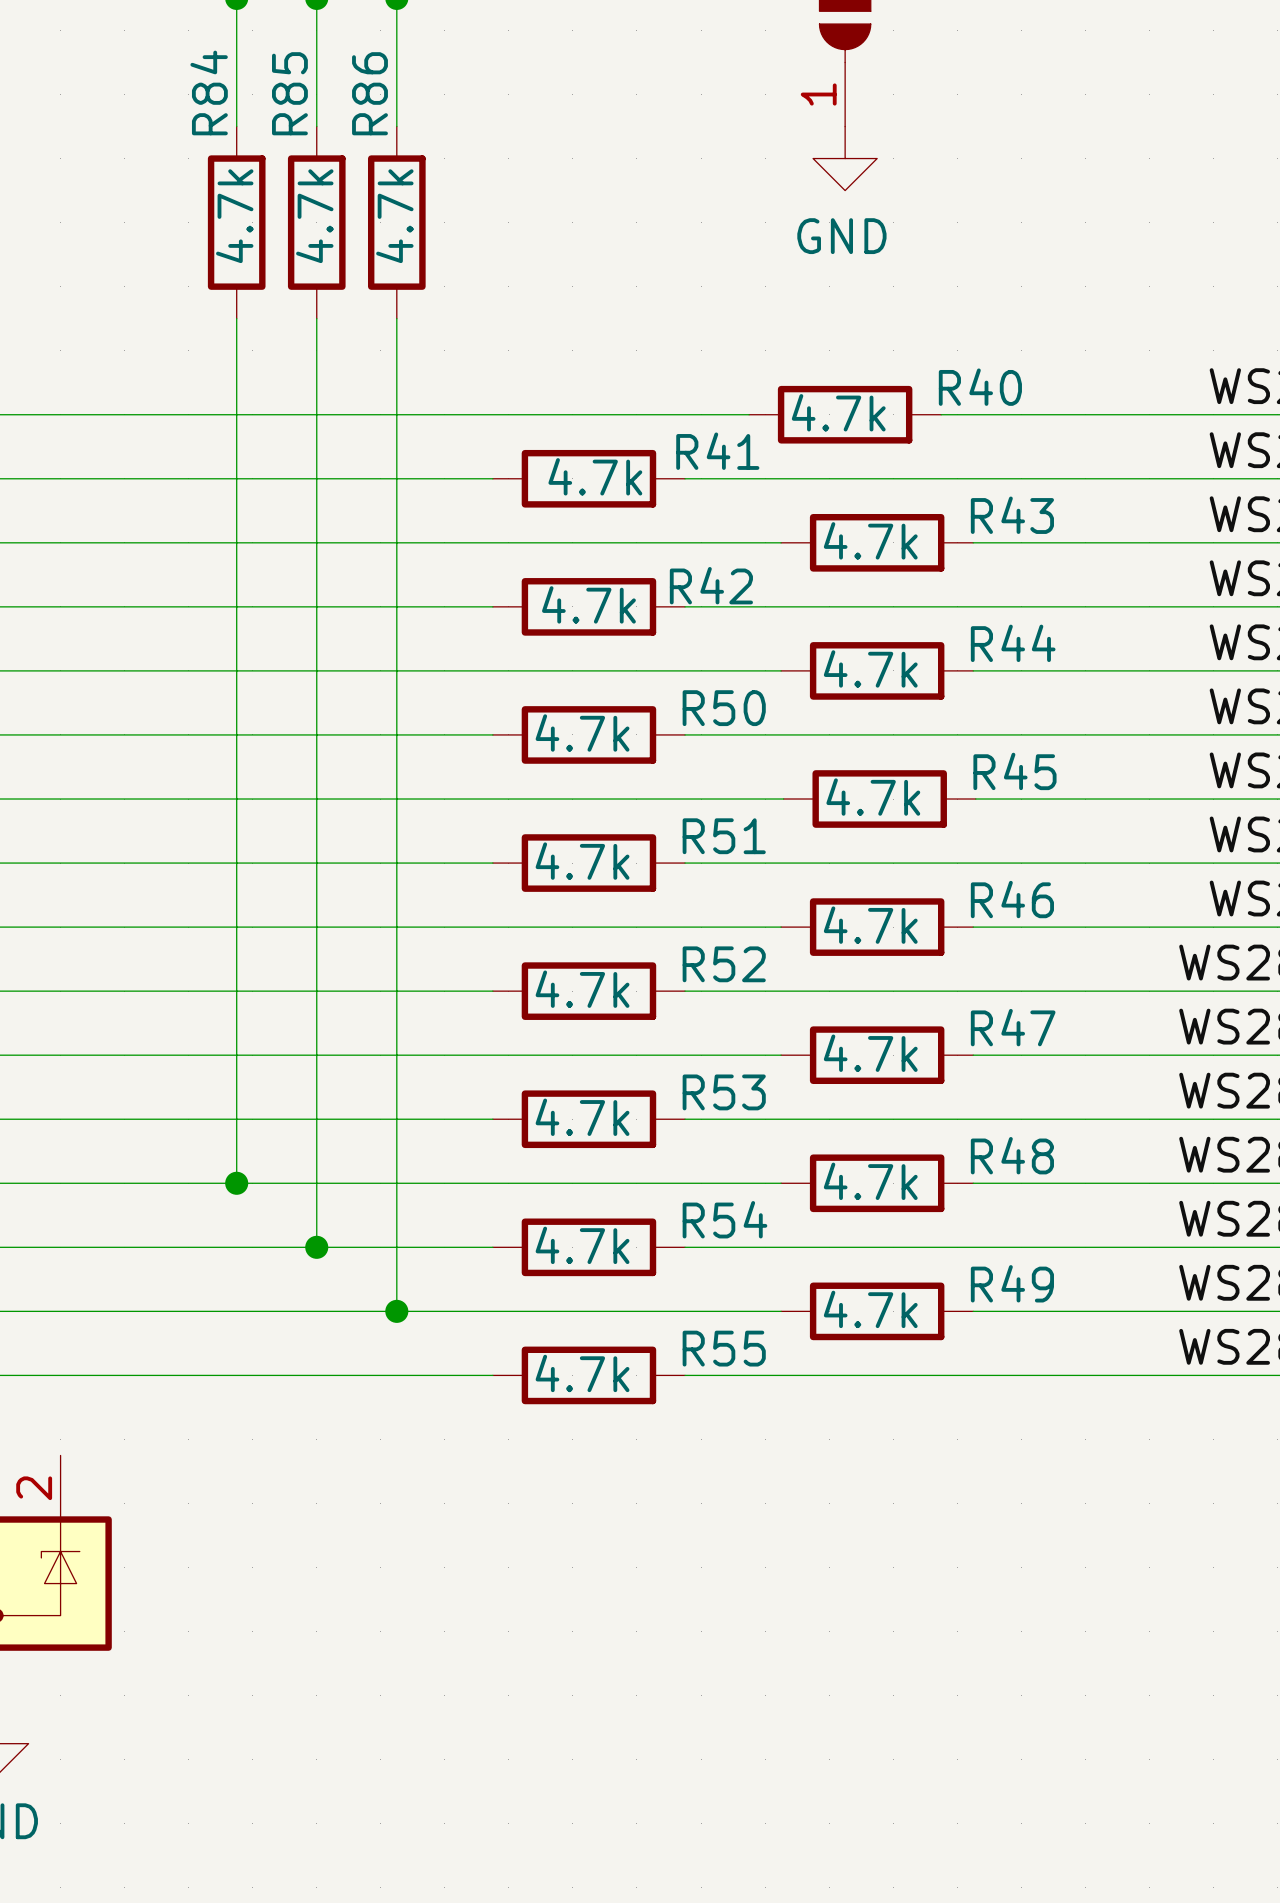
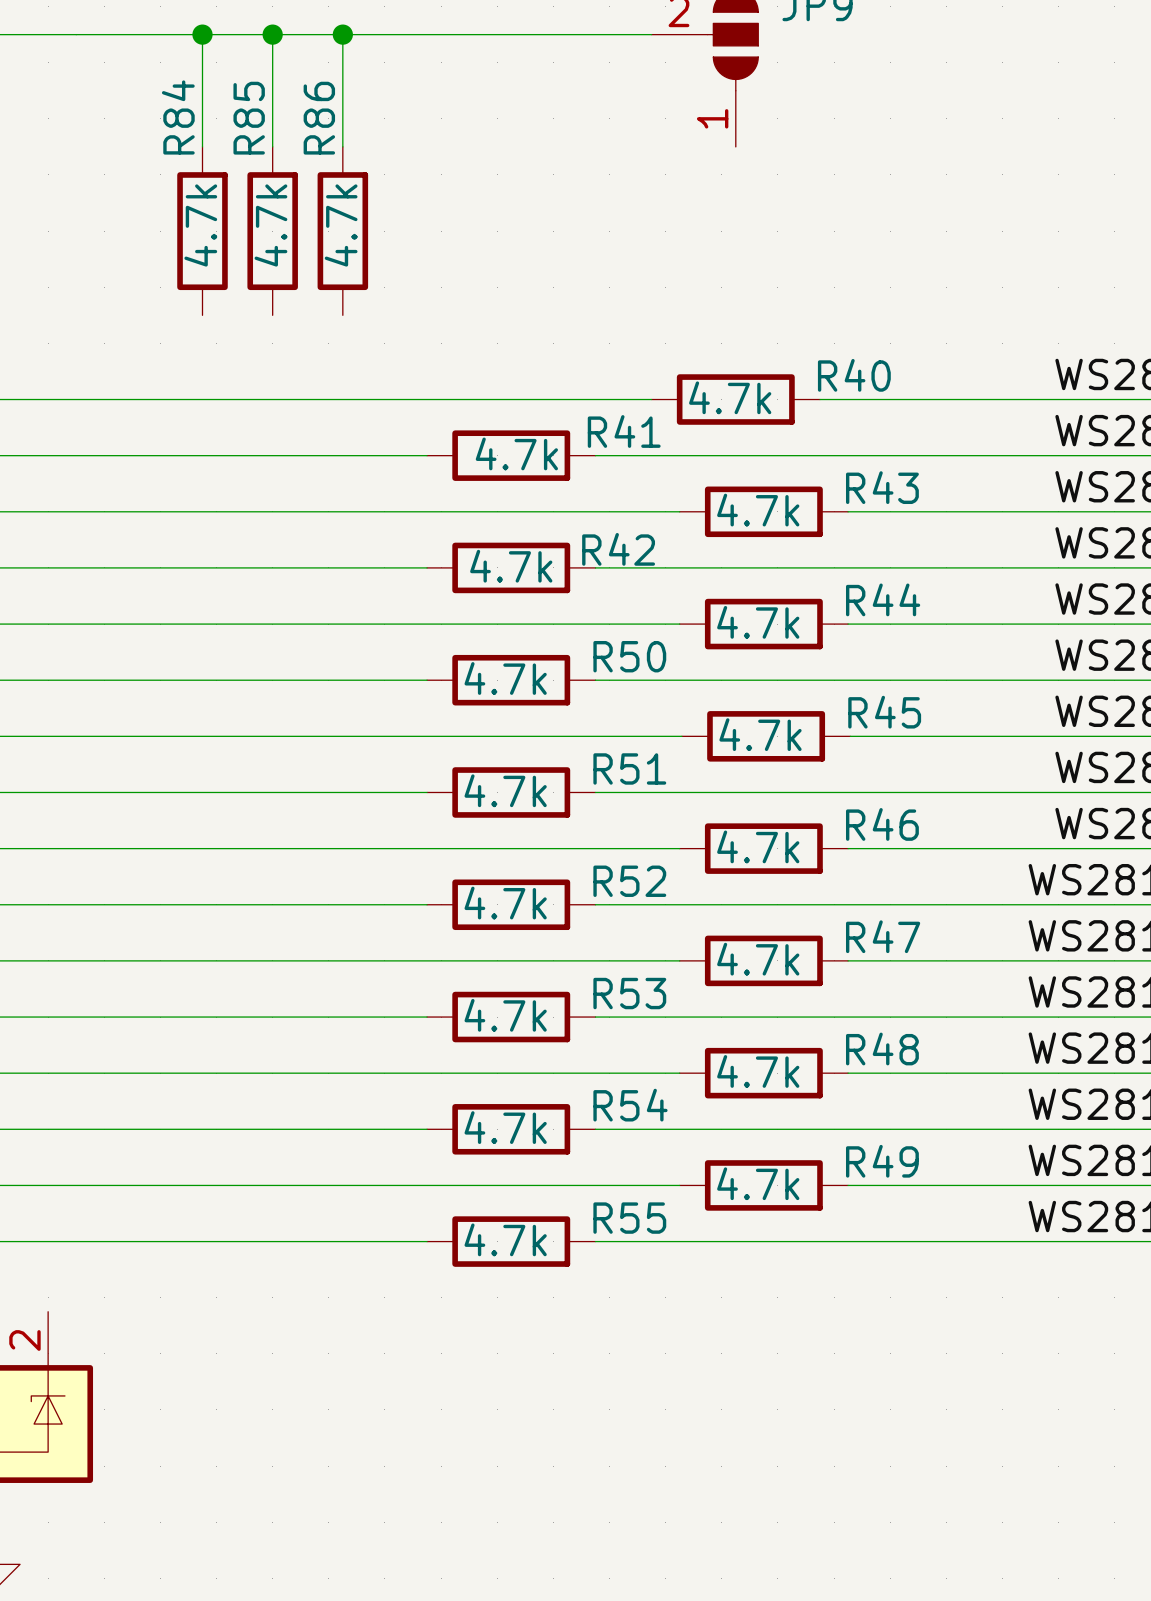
power symbol: GND (845, 158) -> none
wire: (236, 318) (236, 1183) -> none
wire: (316, 318) (316, 1247) -> none
wire: (396, 318) (396, 1311) -> none
junction: (236, 1183) -> none
junction: (316, 1247) -> none
junction: (396, 1311) -> none

